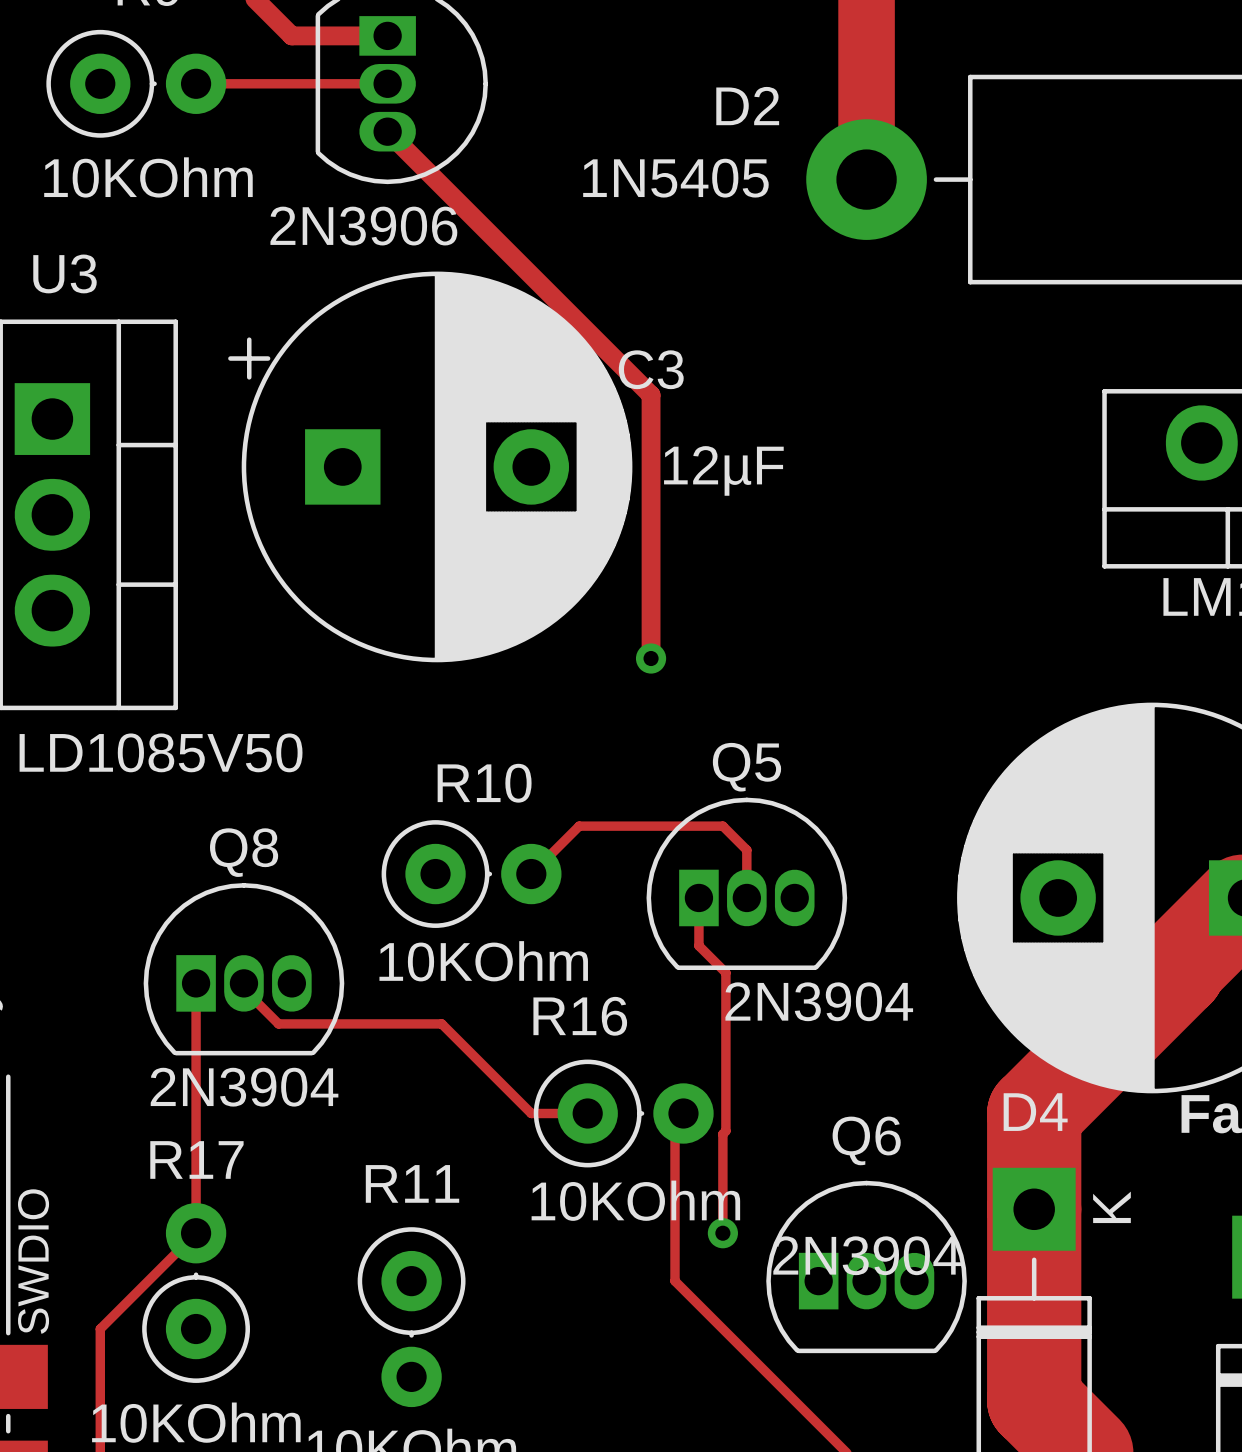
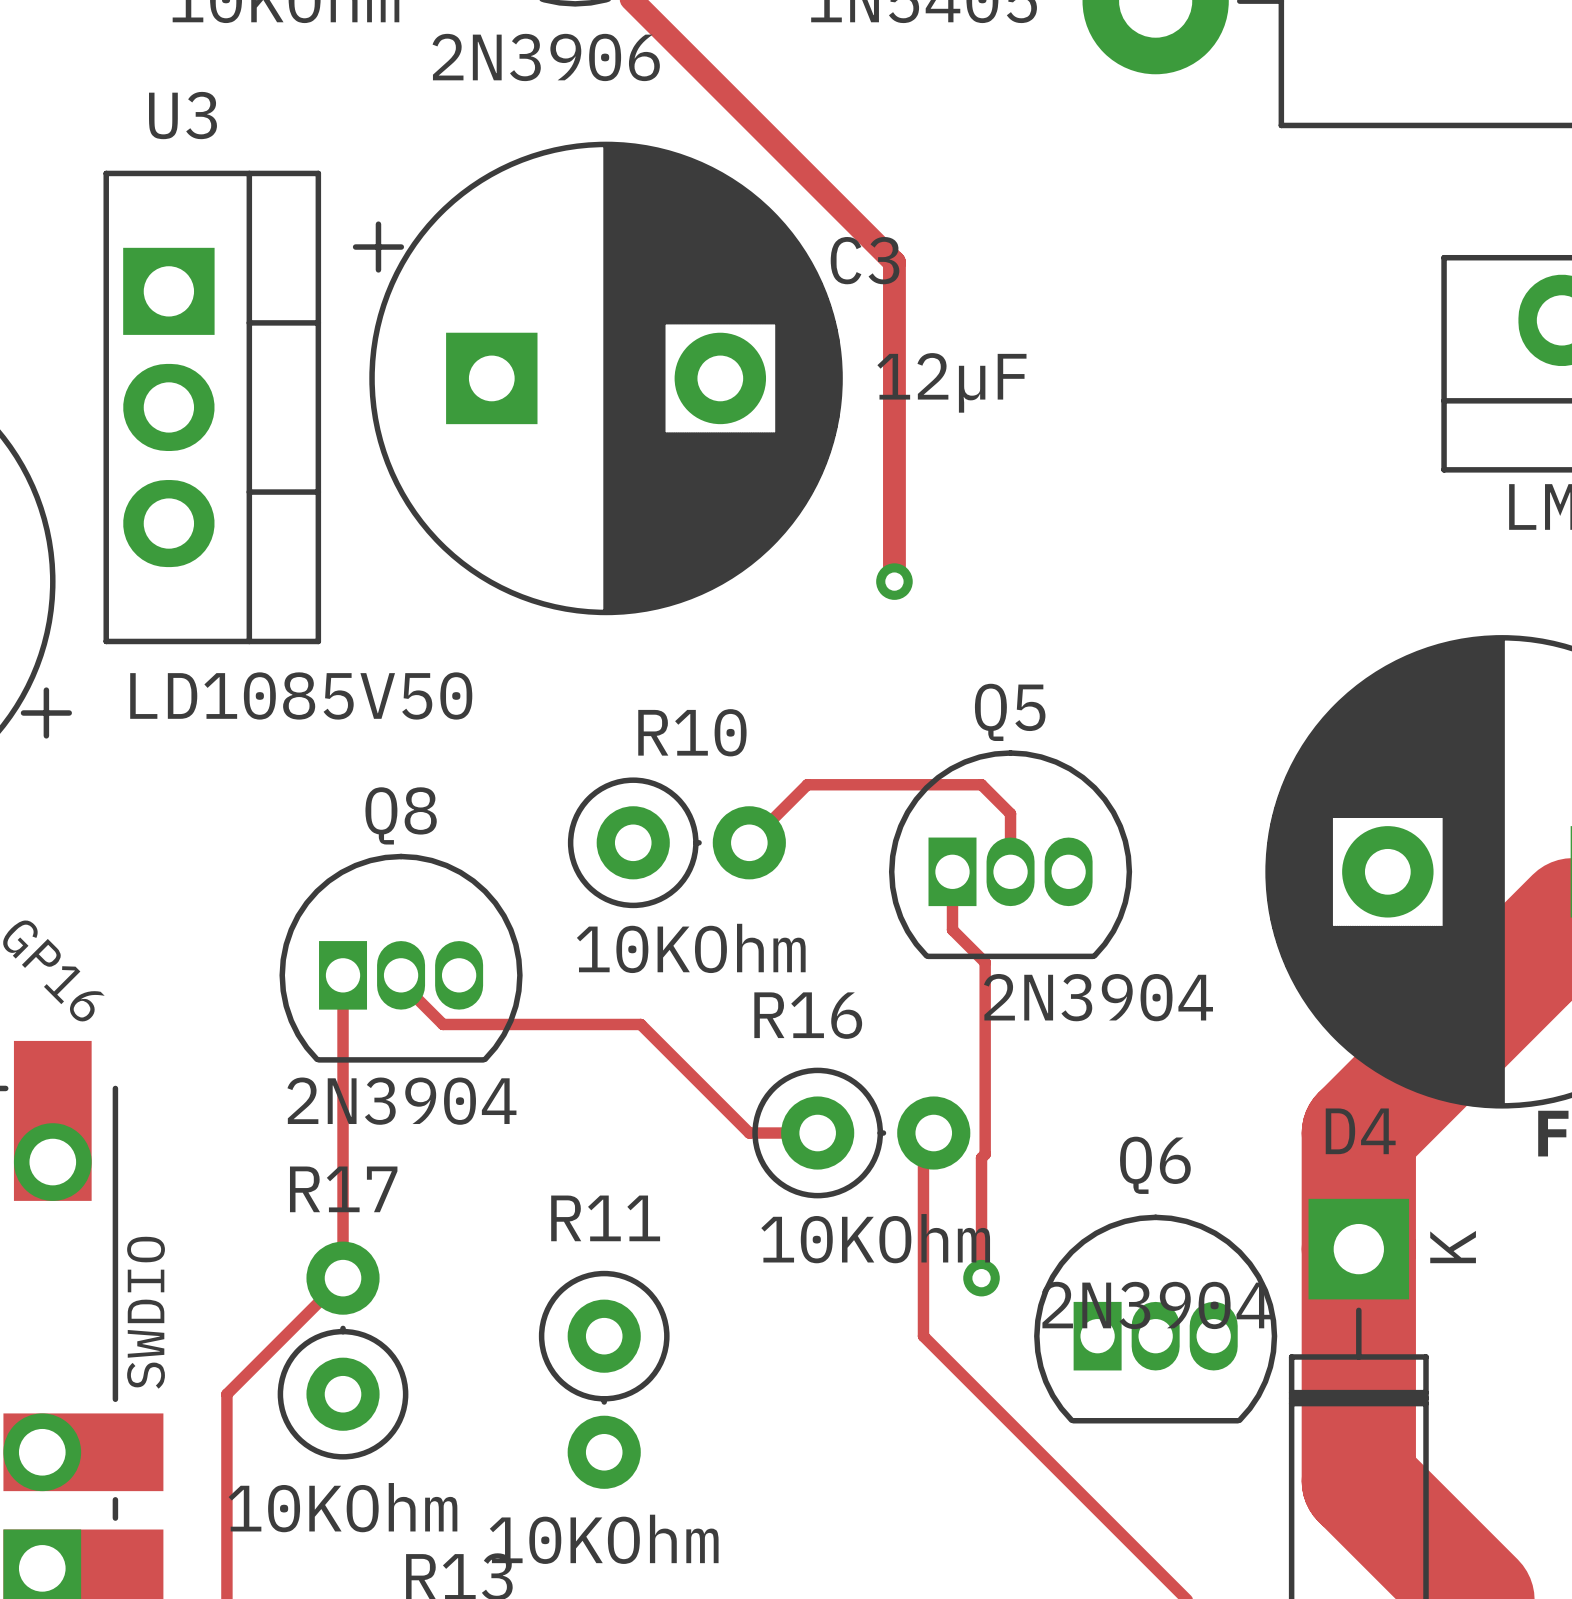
C3 position: (430, 466) -> (597, 378)

